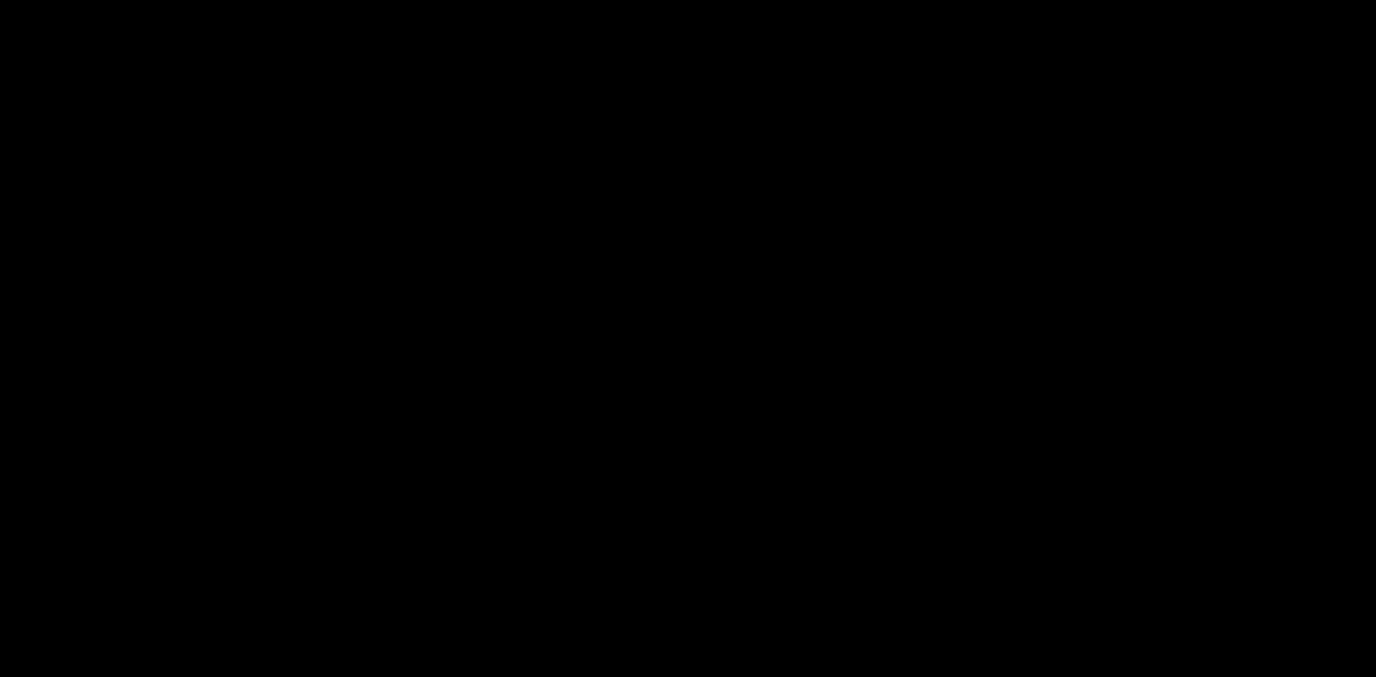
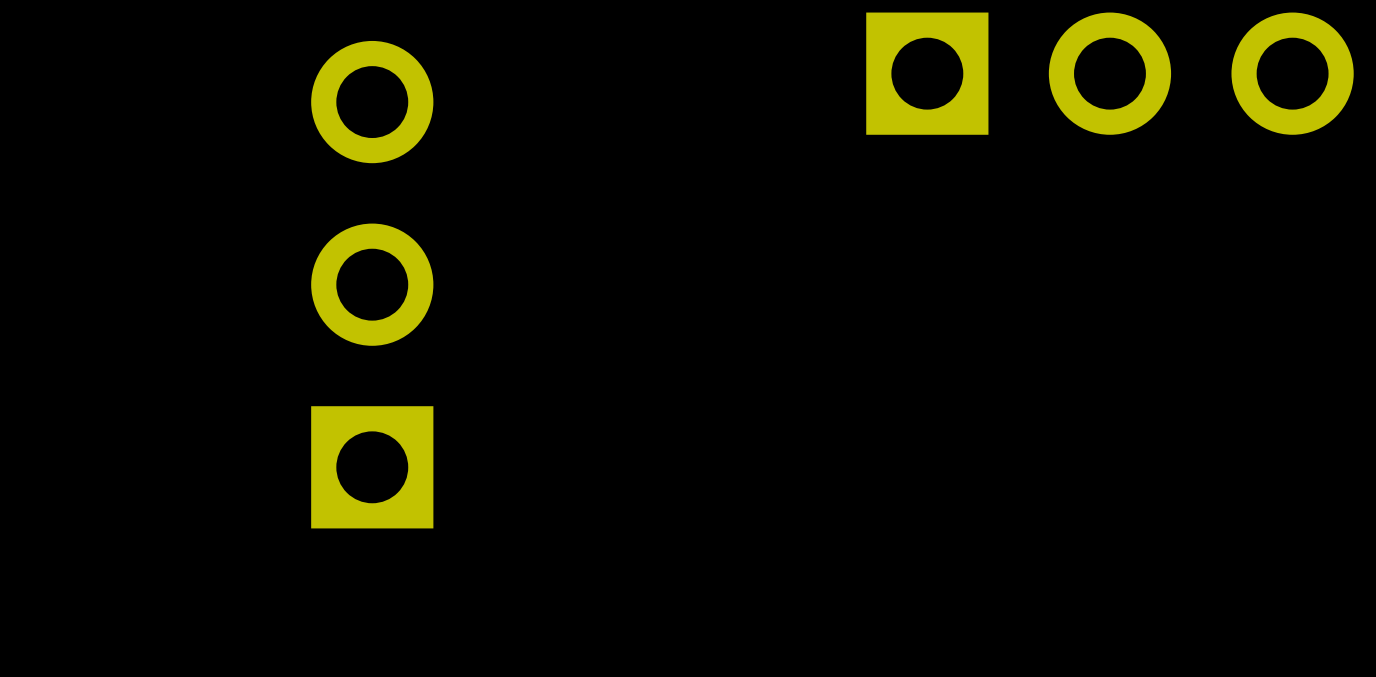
part: none -> (1109, 73)
part: none -> (372, 284)

